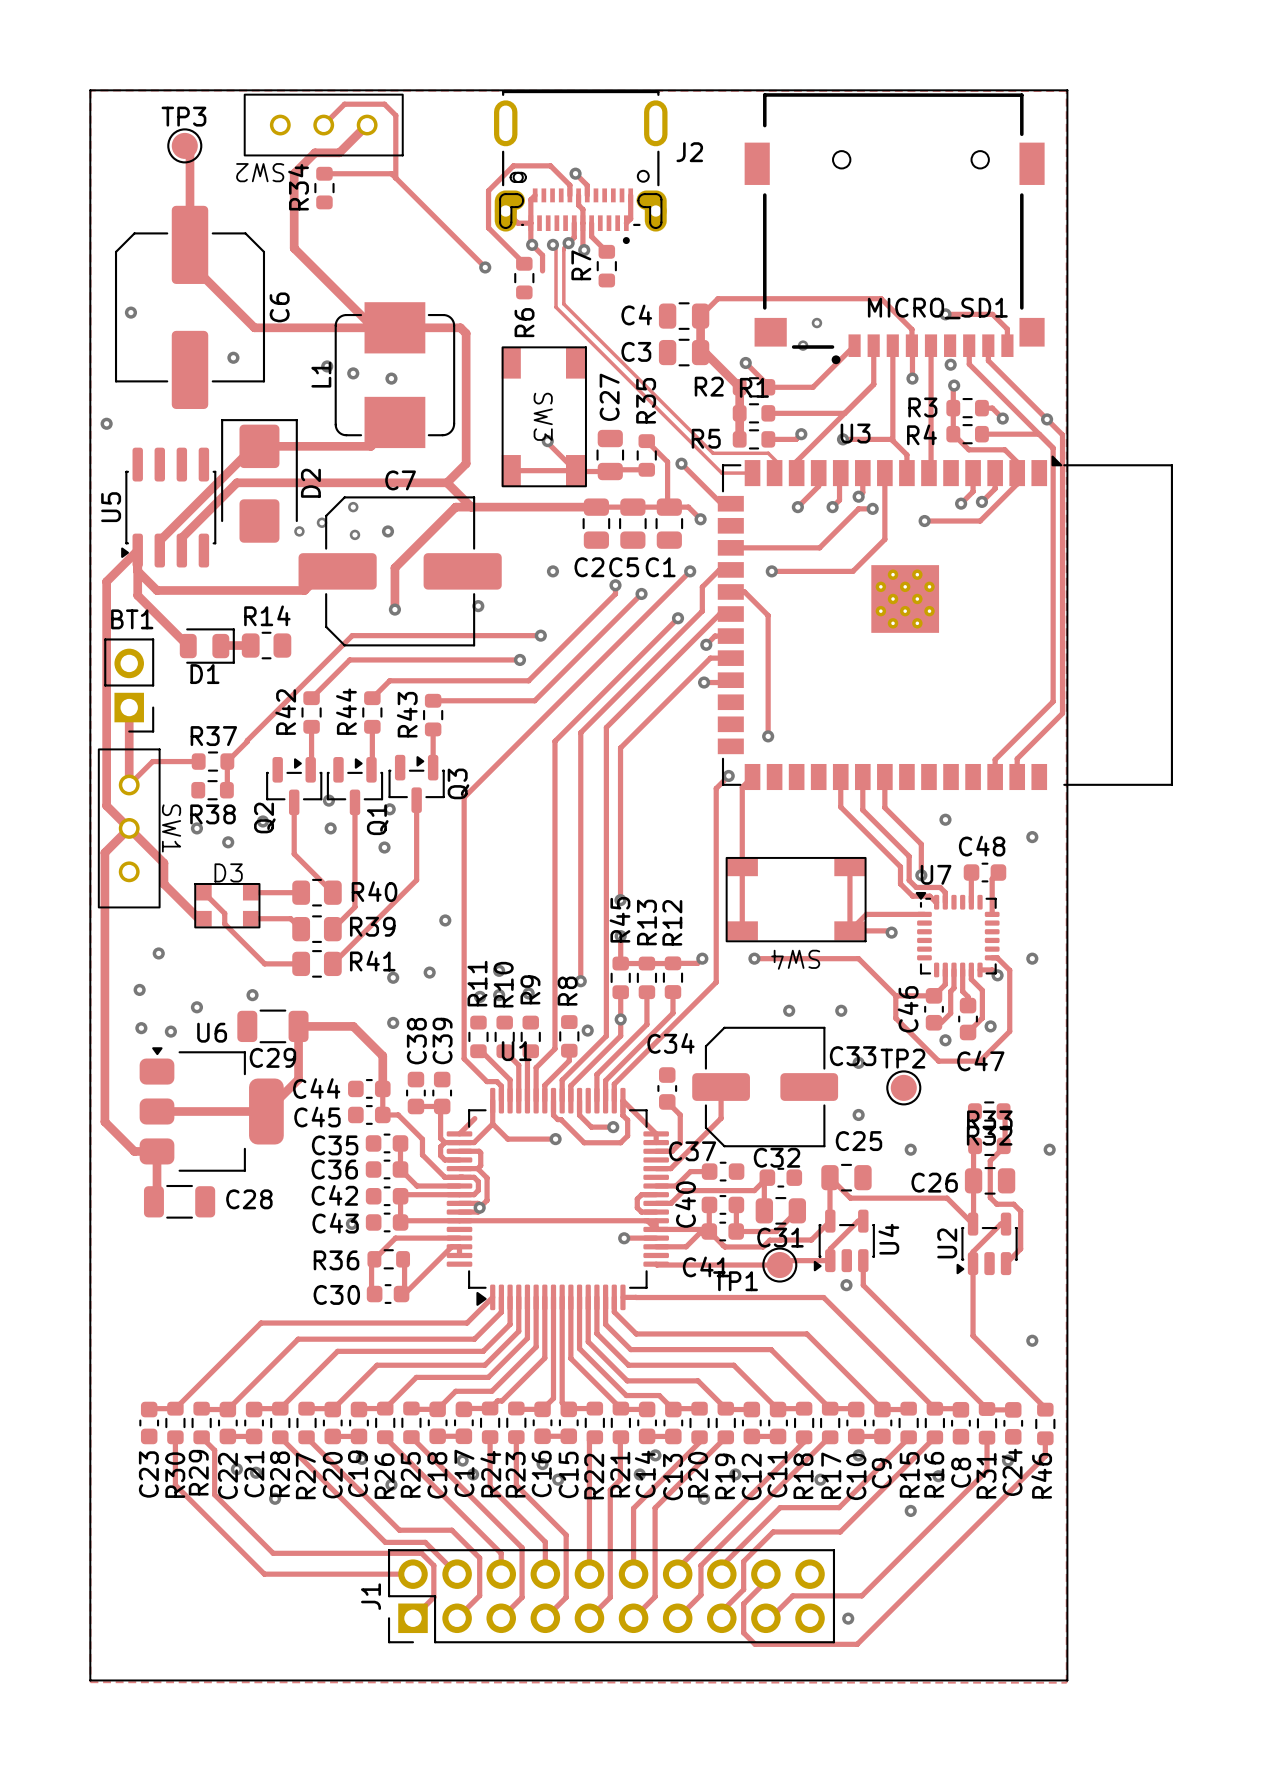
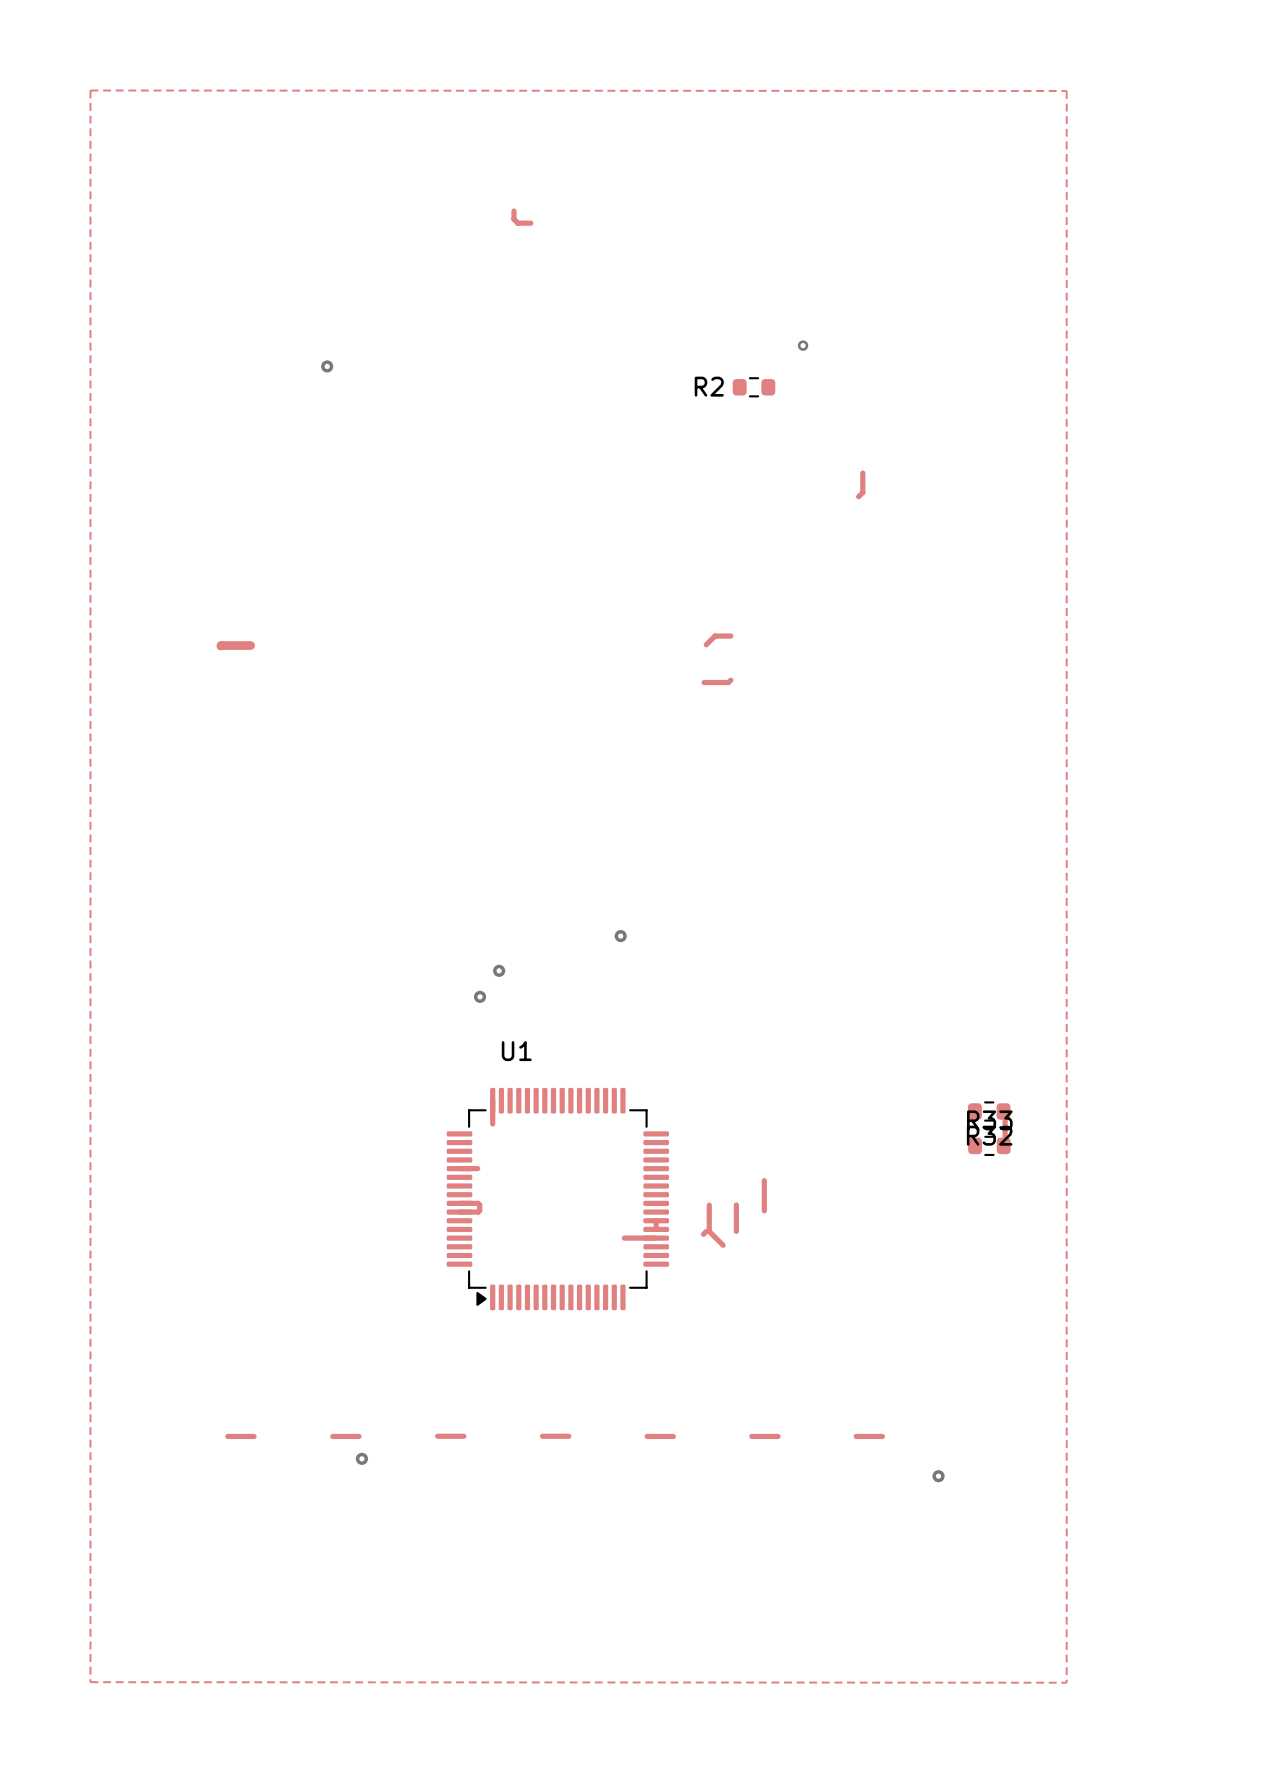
board edge: (90, 90) (1067, 90) (1067, 1680) (90, 1680) (90, 90) -> none
track: (323, 125) (344, 104) (384, 104) (395, 115) (395, 178) -> none
SW2: (323, 125) -> none
track: (367, 125) (339, 152) (315, 152) (294, 173) (294, 248) (373, 327) -> none
track: (184, 145) (190, 151) (190, 263) (254, 327) (460, 327) (466, 333) (466, 463) (447, 482) -> none
TP3: (184, 145) -> none
J2: (580, 167) -> none
track: (324, 173) (391, 173) (485, 267) -> none
track: (575, 173) (587, 185) (587, 195) -> none
via: (575, 173) -> none
R34: (324, 188) -> none
track: (535, 195) (530, 199) (530, 243) (542, 255) (542, 270) -> none
track: (569, 195) (569, 185) (550, 165) (513, 165) (488, 190) (488, 227) (524, 263) -> none
track: (578, 195) (578, 205) (582, 209) (584, 250) -> none
track: (630, 195) (630, 218) (626, 223) -> none
track: (574, 223) (574, 237) (563, 249) (563, 304) (713, 453) (768, 453) (777, 461) (777, 470) (774, 473) -> none
track: (591, 223) (591, 236) (606, 251) -> none
MICRO_SD1: (894, 228) -> none
via: (568, 243) -> none
via: (532, 244) -> none
track: (552, 244) (556, 247) (556, 307) (721, 473) (752, 473) -> none
via: (552, 244) -> none
via: (584, 250) -> none
R7: (606, 266) -> none
via: (485, 267) -> none
R6: (524, 278) -> none
C6: (190, 307) -> none
via: (130, 312) -> none
track: (945, 314) (992, 314) (1007, 329) (1007, 345) -> none
via: (945, 314) -> none
C4: (684, 316) -> none
via: (816, 323) -> none
track: (854, 345) (812, 387) (768, 387) (745, 362) -> none
C3: (684, 352) -> none
track: (873, 353) (873, 384) (796, 461) (796, 473) -> none
track: (892, 353) (892, 440) -> none
track: (931, 353) (931, 471) (928, 473) -> none
track: (969, 353) (969, 364) (1053, 448) (1053, 701) (995, 759) (995, 777) -> none
track: (988, 353) (988, 360) (1062, 434) (1062, 713) (1017, 758) (1017, 777) -> none
via: (233, 357) -> none
via: (745, 362) -> none
via: (950, 364) -> none
via: (353, 373) -> none
L1: (394, 375) -> none
via: (391, 378) -> none
track: (912, 378) (911, 329) (881, 298) (717, 298) (700, 316) (700, 352) (704, 352) (739, 387) (739, 439) -> none
via: (912, 378) -> none
track: (954, 385) (953, 434) (968, 449) (1004, 449) (1017, 462) (1017, 484) (980, 521) (924, 521) -> none
via: (954, 385) -> none
R3: (967, 408) -> none
track: (981, 408) (992, 408) (1002, 418) -> none
R1: (754, 413) -> none
track: (768, 413) (844, 413) -> none
SW3: (544, 416) -> none
via: (1002, 418) -> none
via: (1047, 419) -> none
track: (381, 422) (394, 422) (371, 446) (254, 446) (159, 540) (159, 550) -> none
via: (106, 423) -> none
track: (801, 434) (796, 439) (768, 439) -> none
via: (801, 434) -> none
R4: (967, 434) -> none
track: (981, 434) (1039, 434) -> none
R5: (754, 439) -> none
track: (843, 439) (891, 439) (906, 454) (906, 473) -> none
via: (843, 439) -> none
track: (547, 441) (576, 471) (646, 469) -> none
via: (547, 441) -> none
track: (646, 441) (667, 461) (667, 507) -> none
C27: (610, 455) -> none
R35: (646, 455) -> none
track: (681, 463) (721, 503) (730, 503) -> none
via: (681, 463) -> none
track: (511, 470) (575, 470) -> none
track: (818, 473) (818, 486) (797, 507) -> none
track: (840, 473) (839, 500) (832, 507) -> none
track: (884, 473) (884, 539) (852, 571) (771, 571) -> none
track: (973, 473) (973, 491) (961, 503) -> none
track: (995, 473) (995, 488) (981, 501) -> none
D2: (259, 480) -> none
track: (447, 482) (471, 507) -> none
track: (447, 482) (236, 482) (181, 537) (181, 550) -> none
via: (858, 496) -> none
via: (981, 501) -> none
via: (961, 503) -> none
U5: (168, 507) -> none
via: (353, 507) -> none
via: (797, 507) -> none
via: (832, 507) -> none
track: (872, 508) (858, 508) (819, 547) (730, 547) -> none
via: (872, 508) -> none
track: (700, 519) (688, 507) (455, 507) (394, 567) (394, 609) -> none
via: (700, 519) -> none
via: (924, 521) -> none
via: (321, 522) -> none
C2: (596, 523) -> none
C5: (632, 523) -> none
C1: (669, 523) -> none
via: (299, 531) -> none
via: (387, 531) -> none
via: (354, 534) -> none
track: (730, 569) (719, 569) (702, 587) (702, 611) (580, 732) (580, 981) -> none
track: (137, 571) (157, 590) (304, 590) (323, 571) (356, 571) -> none
C7: (400, 571) -> none
via: (552, 571) -> none
track: (690, 571) (464, 797) (464, 1058) (486, 1081) (496, 1081) (501, 1086) (501, 1100) -> none
via: (690, 571) -> none
via: (771, 571) -> none
track: (615, 585) (615, 593) (528, 680) (389, 680) (372, 698) -> none
via: (615, 585) -> none
track: (730, 591) (744, 591) (768, 615) (768, 736) -> none
track: (641, 593) (534, 700) (433, 700) -> none
via: (641, 593) -> none
via: (478, 606) -> none
via: (394, 609) -> none
track: (730, 614) (719, 614) (606, 727) (606, 1035) (562, 1080) (562, 1100) -> none
track: (678, 618) (554, 741) (554, 1048) (536, 1067) (536, 1100) -> none
via: (678, 618) -> none
U3: (945, 622) -> none
track: (540, 635) (352, 635) (227, 761) (226, 790) -> none
via: (540, 635) -> none
via: (706, 644) -> none
R14: (266, 645) -> none
track: (188, 646) (137, 595) (137, 550) (106, 581) (106, 805) (163, 863) (163, 883) (198, 918) (203, 918) -> none
D1: (207, 646) -> none
track: (730, 658) (710, 658) (620, 748) (620, 900) -> none
track: (519, 659) (349, 659) (311, 698) -> none
via: (519, 659) -> none
via: (704, 682) -> none
BT1: (129, 685) -> none
track: (129, 707) (129, 785) (152, 761) (198, 761) -> none
R42: (311, 712) -> none
R44: (372, 712) -> none
R43: (433, 715) -> none
track: (311, 726) (310, 769) -> none
track: (372, 726) (371, 769) -> none
track: (433, 729) (433, 767) -> none
via: (768, 736) -> none
R37: (213, 761) -> none
track: (728, 775) (716, 788) (716, 982) (614, 1084) (614, 1100) -> none
via: (728, 775) -> none
track: (752, 777) (742, 787) (742, 930) -> none
track: (840, 777) (840, 807) (900, 866) (900, 883) (912, 896) (929, 896) (936, 902) -> none
track: (862, 777) (862, 810) (909, 856) (909, 880) (916, 887) (940, 887) (945, 892) (945, 902) -> none
track: (884, 777) (884, 807) (921, 844) (921, 875) -> none
Q3: (416, 783) -> none
Q2: (294, 786) -> none
Q1: (354, 786) -> none
R38: (212, 790) -> none
via: (328, 800) -> none
track: (416, 800) (416, 880) (332, 963) -> none
track: (294, 802) (294, 854) (332, 892) -> none
track: (354, 802) (354, 907) (332, 929) -> none
via: (389, 809) -> none
via: (945, 819) -> none
via: (262, 821) -> none
track: (129, 828) (104, 852) (104, 1121) (134, 1151) (157, 1151) (157, 1198) (153, 1201) -> none
SW1: (129, 828) -> none
via: (196, 828) -> none
via: (330, 828) -> none
via: (1032, 837) -> none
via: (228, 842) -> none
via: (384, 847) -> none
track: (849, 866) (849, 930) -> none
track: (971, 872) (971, 902) -> none
C48: (984, 872) -> none
track: (998, 872) (992, 878) (992, 914) -> none
via: (921, 875) -> none
track: (203, 892) (224, 913) (224, 923) (264, 963) (301, 963) -> none
track: (250, 892) (301, 892) -> none
R40: (317, 892) -> none
SW4: (796, 899) -> none
via: (620, 900) -> none
D3: (227, 905) -> none
track: (924, 914) (866, 914) (849, 930) -> none
track: (250, 918) (290, 918) (301, 929) -> none
via: (445, 920) -> none
R39: (317, 929) -> none
track: (849, 930) (889, 930) (891, 932) -> none
via: (891, 932) -> none
U7: (957, 934) -> none
track: (620, 936) (620, 963) (672, 963) -> none
via: (158, 953) -> none
track: (992, 957) (997, 957) (1009, 970) (1009, 1031) (980, 1061) (938, 1061) (895, 1018) (895, 995) -> none
track: (702, 958) (697, 963) (672, 963) -> none
via: (702, 958) -> none
track: (754, 958) (858, 958) (895, 995) -> none
via: (754, 958) -> none
via: (1032, 958) -> none
R41: (317, 963) -> none
track: (945, 969) (945, 984) (934, 995) (895, 995) -> none
track: (953, 969) (953, 988) (950, 991) (950, 1013) (941, 1022) -> none
track: (962, 969) (962, 991) (968, 996) (968, 1005) -> none
track: (971, 969) (971, 979) (982, 990) (982, 1018) (968, 1032) -> none
track: (980, 969) (992, 969) (997, 975) -> none
via: (429, 972) -> none
via: (997, 975) -> none
via: (393, 977) -> none
R45: (620, 977) -> none
R13: (646, 977) -> none
R12: (672, 977) -> none
via: (580, 981) -> none
via: (139, 989) -> none
track: (620, 992) (620, 1035) (570, 1085) (570, 1100) -> none
track: (646, 992) (646, 1024) (596, 1074) (596, 1100) -> none
track: (672, 992) (672, 1013) (605, 1080) (605, 1100) -> none
via: (528, 993) -> none
via: (252, 995) -> none
via: (499, 995) -> none
via: (196, 1007) -> none
C46: (934, 1009) -> none
via: (789, 1010) -> none
via: (841, 1010) -> none
via: (620, 1019) -> none
C47: (968, 1019) -> none
via: (393, 1022) -> none
C29: (272, 1026) -> none
via: (990, 1026) -> none
via: (141, 1028) -> none
via: (587, 1030) -> none
via: (170, 1031) -> none
R11: (478, 1036) -> none
R10: (504, 1036) -> none
R9: (530, 1036) -> none
R8: (569, 1036) -> none
via: (945, 1040) -> none
track: (569, 1050) (569, 1060) (544, 1085) (544, 1100) -> none
track: (478, 1051) (481, 1051) (510, 1079) (510, 1100) -> none
track: (504, 1051) (518, 1065) (518, 1100) -> none
track: (530, 1051) (527, 1054) (527, 1100) -> none
via: (858, 1062) -> none
track: (721, 1087) (721, 1118) (670, 1168) (656, 1168) -> none
C33: (765, 1087) -> none
TP2: (903, 1087) -> none
C44: (369, 1088) -> none
C34: (667, 1088) -> none
C38: (415, 1093) -> none
C39: (442, 1093) -> none
track: (553, 1100) (553, 1115) (557, 1119) (561, 1119) (584, 1142) (620, 1142) (627, 1135) (627, 1120) (622, 1115) -> none
track: (579, 1100) (579, 1115) (591, 1127) (613, 1127) -> none
track: (667, 1101) (680, 1114) (680, 1143) (672, 1151) (656, 1151) -> none
track: (415, 1106) (442, 1106) (440, 1138) (444, 1142) -> none
U6: (211, 1109) -> none
track: (157, 1111) (266, 1111) (298, 1079) (298, 1026) (353, 1026) (382, 1055) (382, 1114) (398, 1114) (422, 1139) (422, 1154) (444, 1177) (474, 1177) (478, 1181) (478, 1190) (474, 1194) (402, 1194) (400, 1222) (402, 1220) (647, 1220) (656, 1229) (703, 1229) -> none
C45: (369, 1114) -> none
via: (858, 1114) -> none
track: (622, 1115) (622, 1100) (656, 1133) (656, 1142) -> none
track: (474, 1118) (459, 1133) -> none
via: (613, 1127) -> none
track: (555, 1139) (507, 1139) (492, 1123) (474, 1142) (444, 1142) -> none
via: (555, 1139) -> none
track: (444, 1142) (440, 1146) (440, 1155) (444, 1159) (459, 1159) -> none
C35: (387, 1143) -> none
track: (400, 1143) (400, 1169) (416, 1186) (459, 1186) -> none
track: (973, 1145) (973, 1224) (947, 1198) (850, 1198) (829, 1177) (830, 1221) (811, 1240) (780, 1240) -> none
track: (1005, 1145) (990, 1160) (990, 1197) (996, 1204) (1013, 1204) (1020, 1211) (1020, 1248) (1006, 1263) -> none
via: (910, 1149) -> none
via: (1049, 1149) -> none
track: (459, 1151) (480, 1152) (480, 1165) (477, 1168) (487, 1178) (487, 1200) (479, 1207) -> none
C36: (387, 1169) -> none
track: (709, 1171) (690, 1171) (676, 1186) (656, 1186) -> none
C37: (723, 1171) -> none
track: (767, 1177) (754, 1190) (683, 1190) (671, 1203) (656, 1203) -> none
C32: (780, 1177) -> none
C25: (846, 1177) -> none
C26: (990, 1180) -> none
track: (656, 1194) (641, 1194) (637, 1198) (637, 1207) (641, 1212) (656, 1212) -> none
C42: (387, 1196) -> none
C28: (179, 1201) -> none
C40: (722, 1204) -> none
via: (479, 1207) -> none
C31: (780, 1210) -> none
track: (797, 1210) (776, 1231) (736, 1231) -> none
track: (863, 1221) (858, 1221) (830, 1248) (830, 1260) (784, 1260) (779, 1265) (656, 1264) -> none
C43: (387, 1222) -> none
via: (351, 1223) -> none
track: (1006, 1224) (1000, 1224) (973, 1251) (973, 1335) (1045, 1408) -> none
track: (709, 1231) (701, 1231) (686, 1246) (656, 1246) -> none
C41: (722, 1231) -> none
track: (459, 1238) (395, 1238) (374, 1259) -> none
via: (624, 1238) -> none
track: (780, 1240) (769, 1240) (763, 1246) (724, 1246) (723, 1245) -> none
U4: (844, 1240) -> none
U2: (987, 1243) -> none
track: (459, 1255) (459, 1246) (451, 1246) (404, 1294) (404, 1259) -> none
R36: (388, 1259) -> none
track: (371, 1260) (371, 1294) -> none
track: (863, 1260) (863, 1285) (987, 1409) (1013, 1409) -> none
TP1: (779, 1265) -> none
via: (846, 1285) -> none
C30: (388, 1294) -> none
track: (492, 1297) (467, 1323) (261, 1323) (175, 1408) (149, 1409) -> none
track: (501, 1297) (501, 1312) (474, 1339) (298, 1339) (227, 1409) (201, 1408) -> none
track: (510, 1297) (510, 1324) (483, 1351) (337, 1351) (280, 1408) (254, 1409) -> none
track: (518, 1297) (518, 1331) (484, 1365) (377, 1365) (332, 1409) (306, 1408) -> none
track: (527, 1297) (527, 1338) (488, 1377) (416, 1377) (385, 1408) (358, 1409) -> none
track: (536, 1297) (536, 1347) (491, 1391) (455, 1391) (437, 1409) (411, 1408) -> none
track: (544, 1297) (544, 1358) (502, 1400) (497, 1400) (490, 1408) (463, 1409) -> none
track: (553, 1297) (553, 1398) (542, 1409) (516, 1408) -> none
track: (562, 1297) (562, 1402) (568, 1409) (594, 1408) -> none
track: (570, 1297) (570, 1358) (621, 1409) (647, 1409) -> none
track: (579, 1297) (579, 1348) (626, 1395) (659, 1395) (673, 1409) (699, 1408) -> none
track: (588, 1297) (588, 1341) (627, 1380) (697, 1380) (726, 1409) (751, 1409) -> none
track: (596, 1297) (596, 1333) (628, 1365) (733, 1365) (778, 1409) (804, 1408) -> none
track: (605, 1297) (605, 1324) (630, 1349) (771, 1349) (830, 1408) (856, 1409) -> none
track: (614, 1297) (614, 1311) (636, 1333) (806, 1333) (882, 1409) (908, 1408) -> none
track: (622, 1297) (635, 1297) -> none
track: (635, 1297) (823, 1297) (934, 1408) (960, 1409) -> none
via: (1032, 1340) -> none
C23: (149, 1422) -> none
R30: (175, 1422) -> none
R29: (201, 1422) -> none
C22: (227, 1422) -> none
C21: (254, 1422) -> none
R28: (280, 1422) -> none
R27: (306, 1422) -> none
C20: (332, 1422) -> none
C19: (358, 1422) -> none
R26: (385, 1422) -> none
R25: (411, 1422) -> none
C18: (437, 1422) -> none
C17: (463, 1422) -> none
R24: (490, 1422) -> none
R23: (516, 1422) -> none
C16: (542, 1422) -> none
C15: (568, 1422) -> none
R22: (594, 1422) -> none
R21: (620, 1422) -> none
C14: (647, 1422) -> none
C13: (673, 1422) -> none
R20: (699, 1422) -> none
R19: (725, 1422) -> none
C12: (751, 1422) -> none
C11: (778, 1422) -> none
R18: (804, 1422) -> none
R17: (830, 1422) -> none
C10: (856, 1422) -> none
C9: (882, 1422) -> none
R15: (908, 1422) -> none
R16: (934, 1423) -> none
C8: (960, 1423) -> none
R31: (987, 1423) -> none
C24: (1013, 1423) -> none
R46: (1045, 1423) -> none
track: (175, 1437) (175, 1485) (264, 1574) (412, 1574) -> none
track: (201, 1437) (214, 1450) (214, 1494) (273, 1553) (421, 1553) (433, 1565) (433, 1597) (412, 1618) -> none
track: (280, 1437) (385, 1542) (425, 1542) (457, 1574) -> none
track: (306, 1437) (399, 1530) (451, 1530) (479, 1558) (479, 1595) (457, 1618) -> none
track: (385, 1437) (501, 1553) (501, 1574) -> none
track: (411, 1437) (522, 1547) (522, 1597) (501, 1618) -> none
track: (490, 1437) (490, 1486) (545, 1542) (545, 1574) -> none
track: (516, 1437) (516, 1485) (566, 1535) (566, 1597) (545, 1618) -> none
track: (594, 1437) (589, 1442) (589, 1574) -> none
track: (620, 1437) (620, 1479) (610, 1489) (610, 1597) (589, 1618) -> none
track: (699, 1437) (699, 1442) (633, 1508) (633, 1574) -> none
track: (725, 1437) (655, 1507) (655, 1596) (633, 1618) -> none
track: (804, 1437) (804, 1442) (677, 1568) (677, 1574) -> none
track: (830, 1437) (700, 1565) (700, 1595) (677, 1618) -> none
track: (908, 1437) (839, 1507) (780, 1507) (721, 1566) (721, 1574) -> none
track: (934, 1437) (840, 1531) (773, 1531) (743, 1561) (743, 1589) (721, 1611) (721, 1618) -> none
track: (987, 1437) (987, 1470) (861, 1595) (792, 1595) (770, 1618) (765, 1618) -> none
track: (1045, 1439) (1045, 1456) (857, 1644) (755, 1644) (743, 1632) (743, 1603) (765, 1581) (765, 1574) -> none
via: (655, 1455) -> none
via: (858, 1455) -> none
via: (462, 1460) -> none
via: (1007, 1460) -> none
via: (542, 1464) -> none
via: (236, 1469) -> none
via: (255, 1472) -> none
via: (473, 1474) -> none
via: (639, 1474) -> none
via: (735, 1474) -> none
via: (558, 1479) -> none
via: (820, 1479) -> none
via: (391, 1484) -> none
via: (275, 1498) -> none
via: (704, 1498) -> none
via: (910, 1510) -> none
J1: (611, 1596) -> none
via: (848, 1618) -> none

